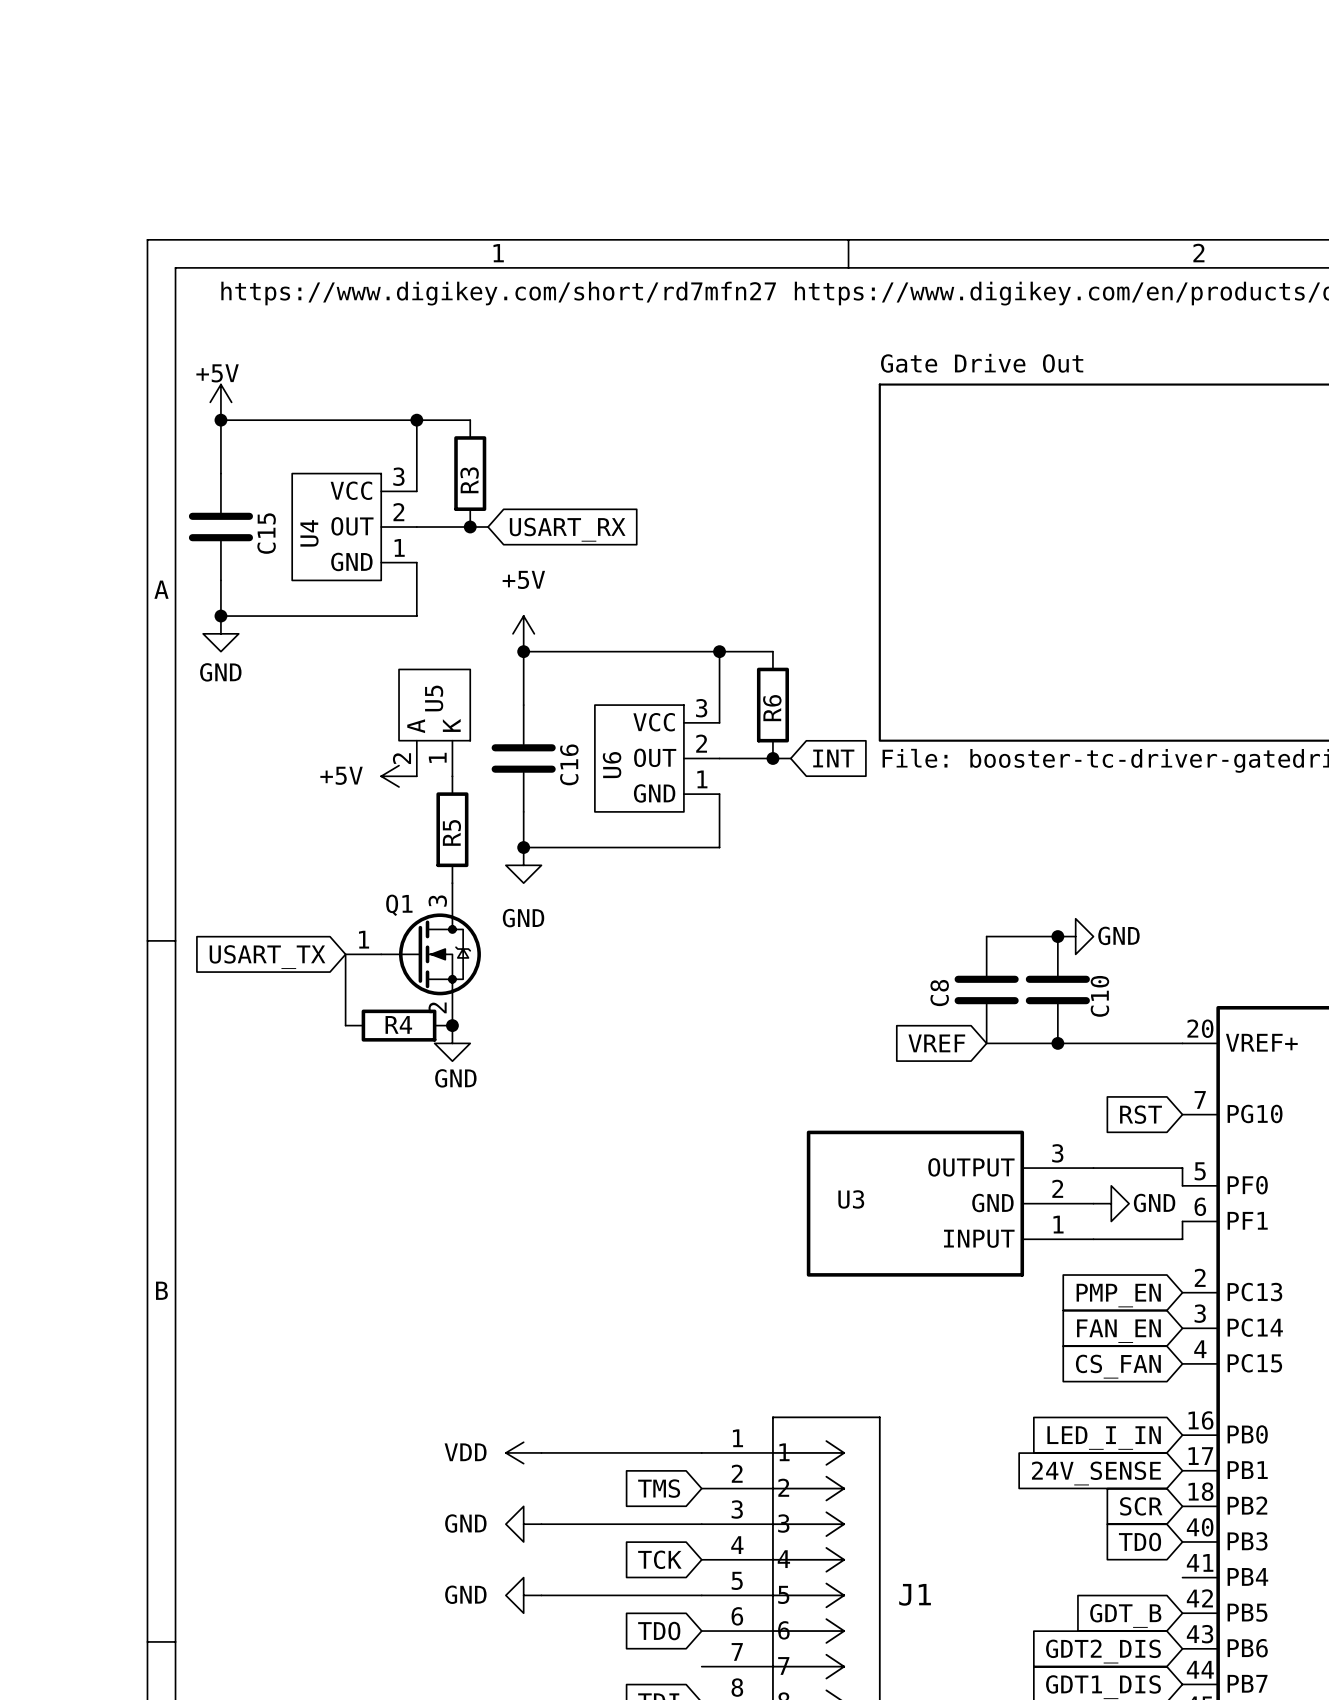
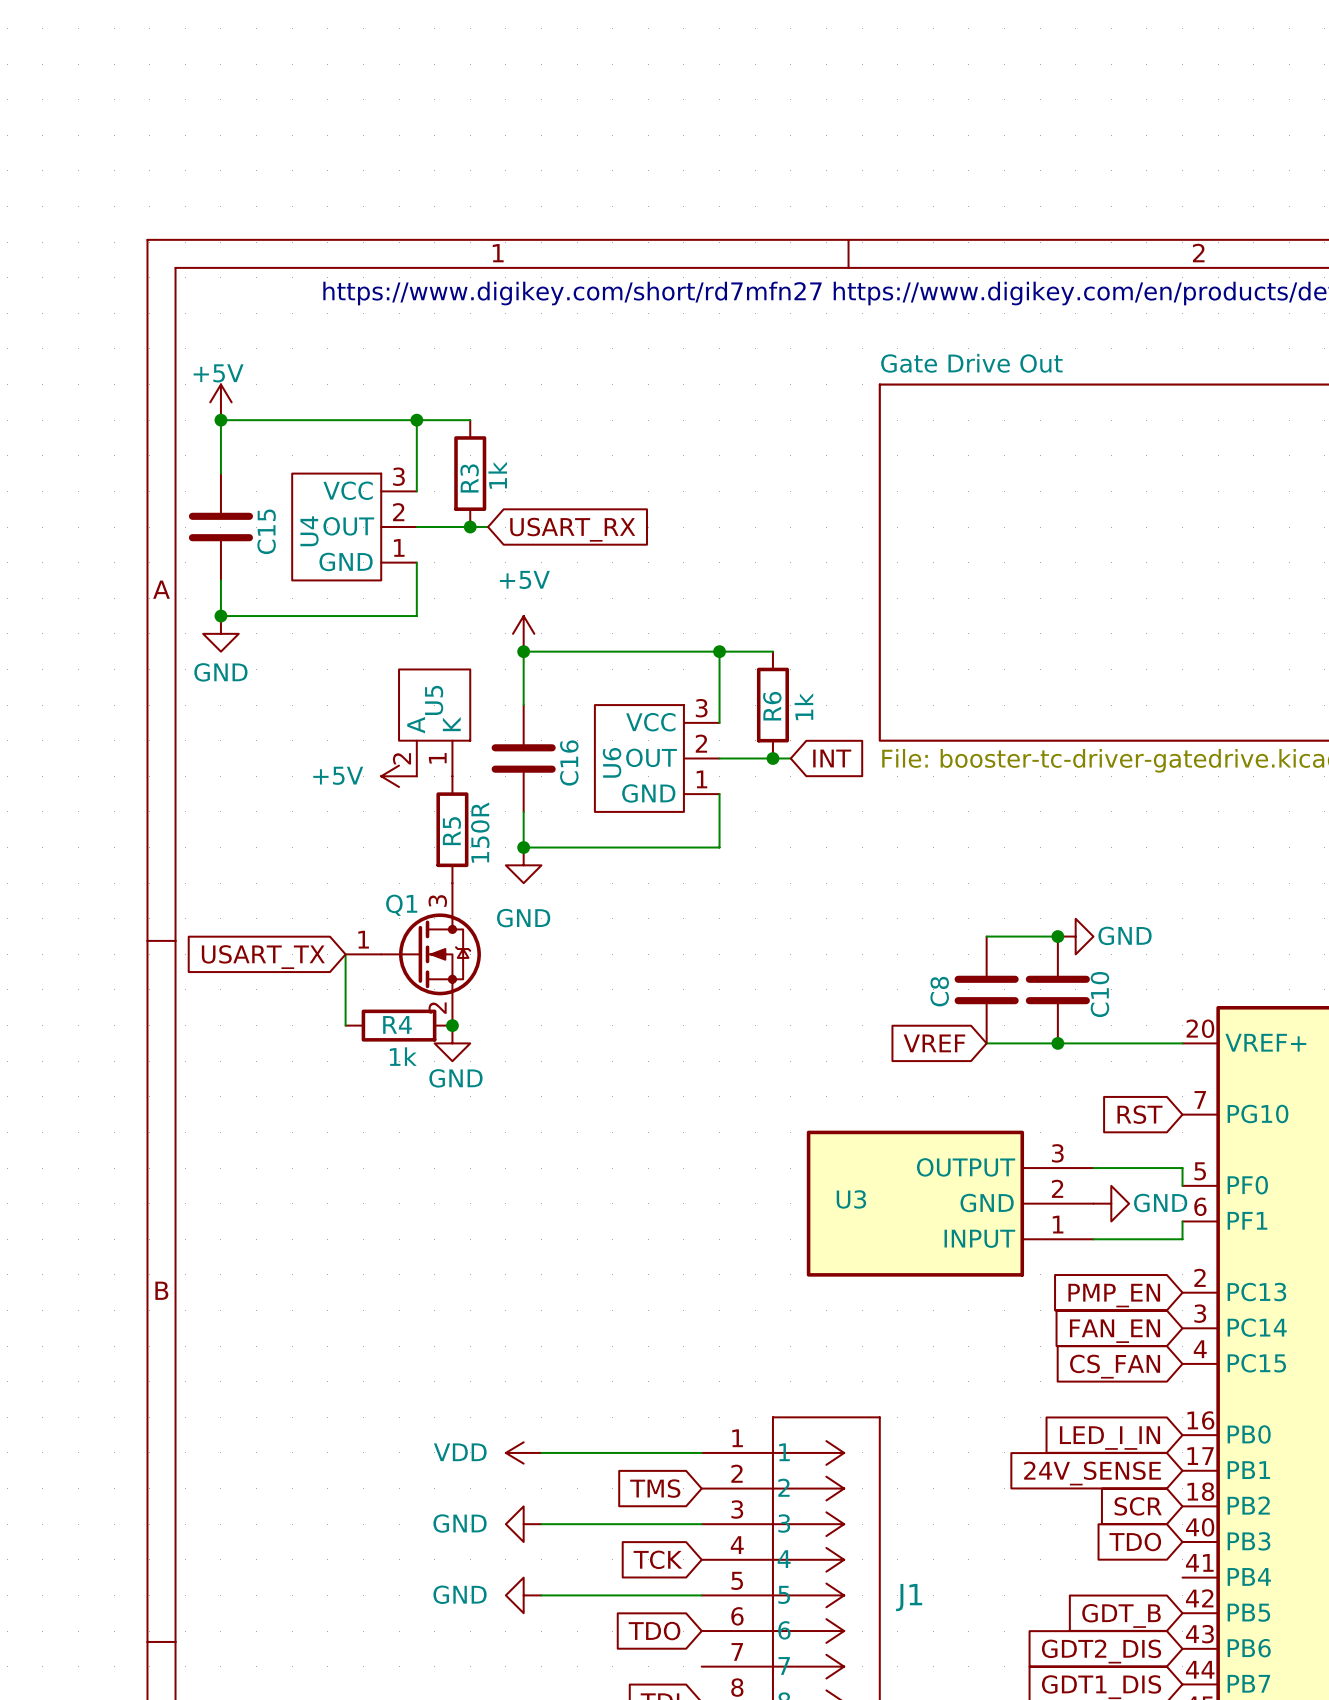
R3 value: none -> 1k (497, 475)
R6 value: none -> 1k (803, 706)
R5 value: none -> 150R (480, 832)
R4 value: none -> 1k (403, 1056)

